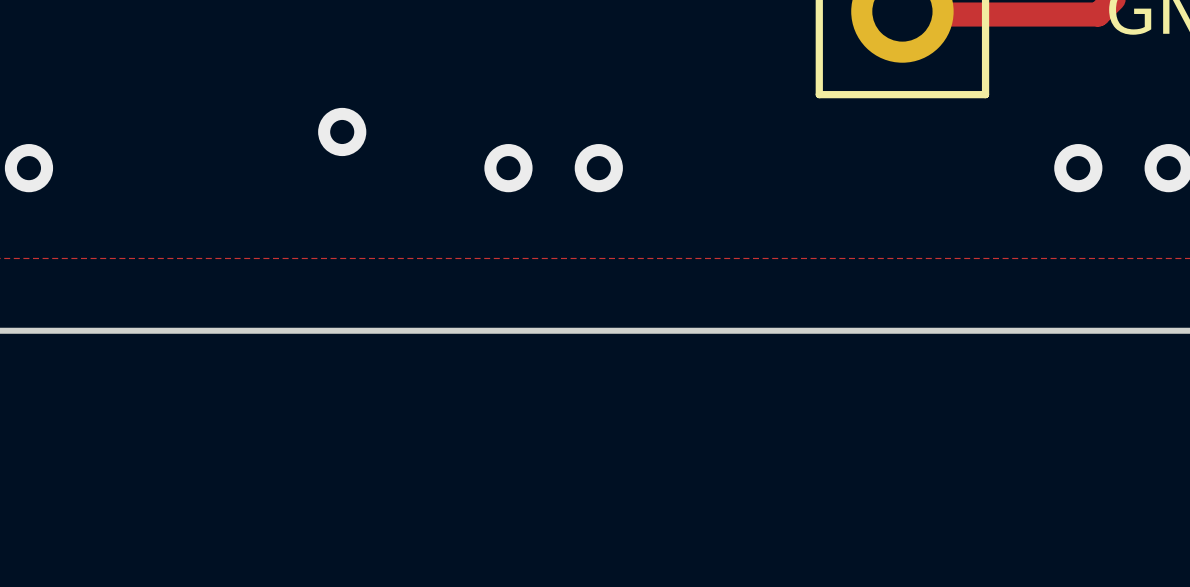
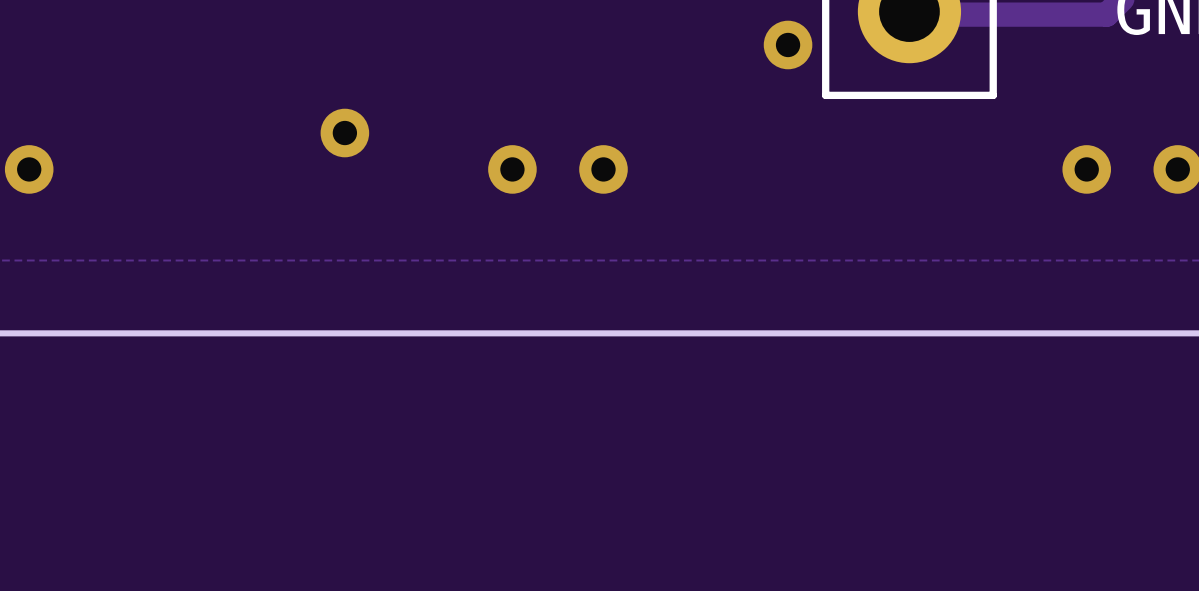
via: none -> (788, 44)

